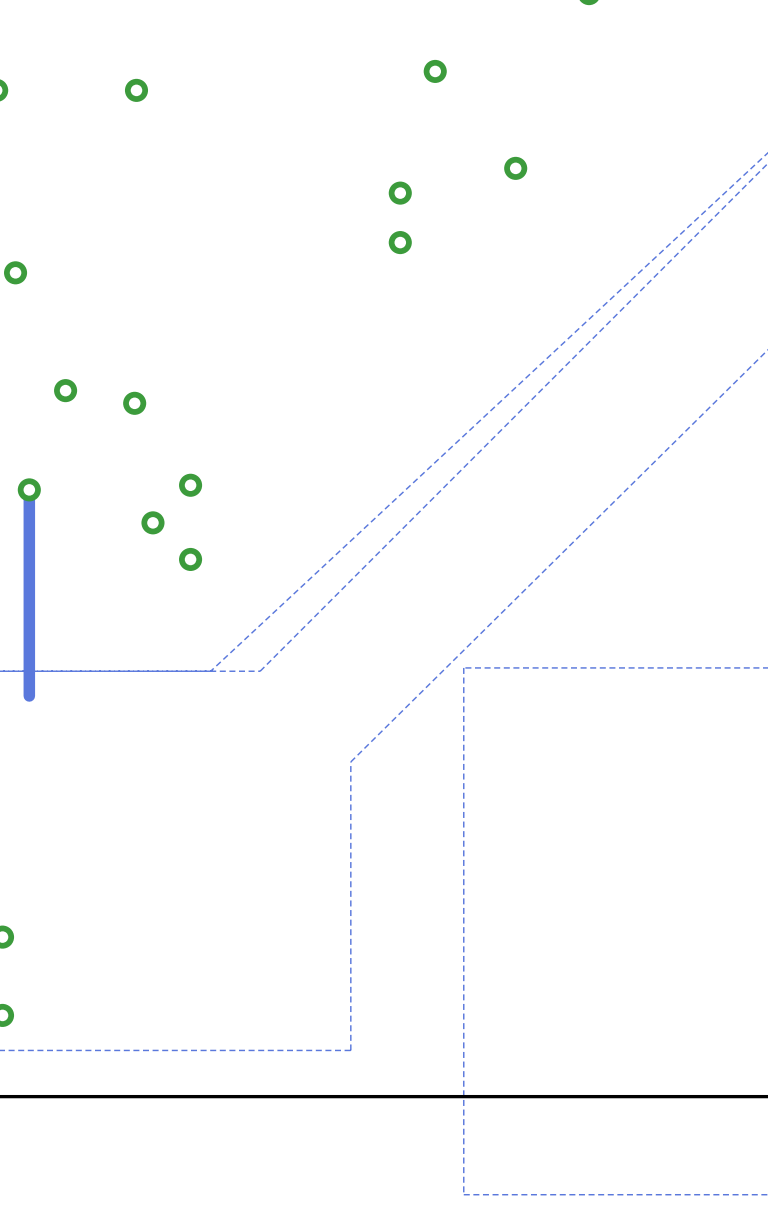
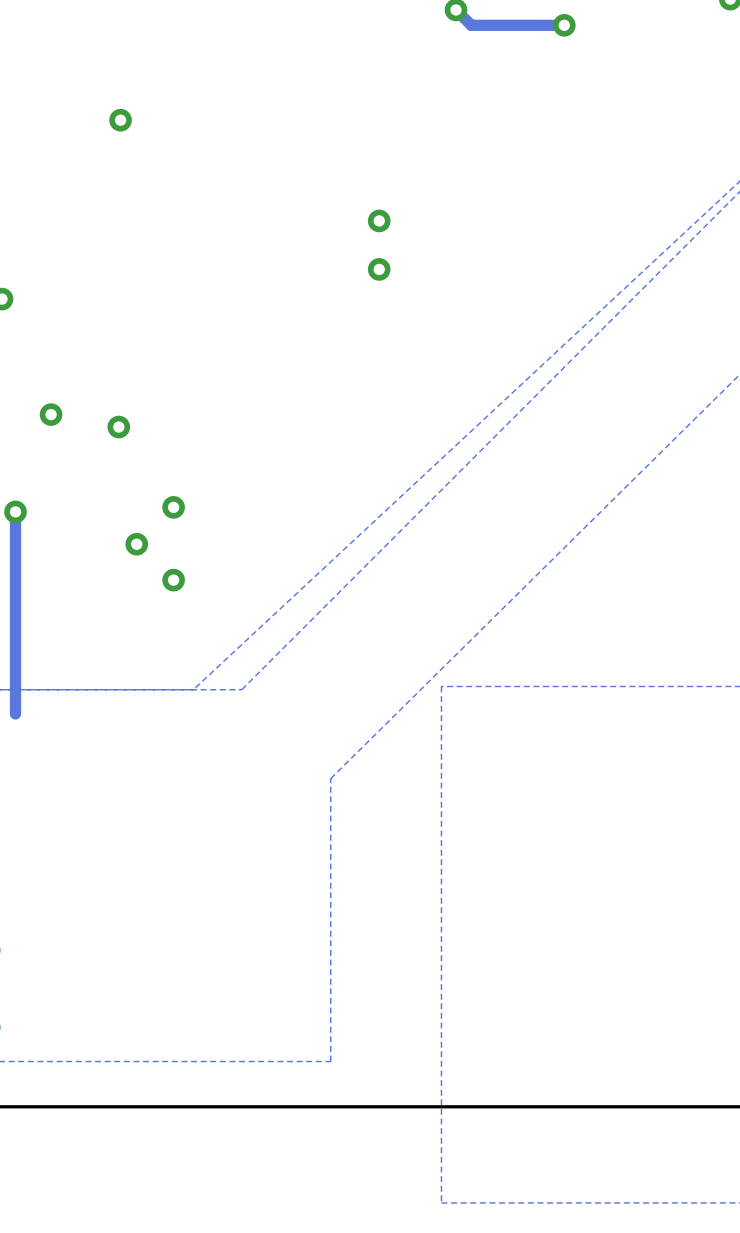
via: (435, 71) -> none
via: (515, 168) -> none

